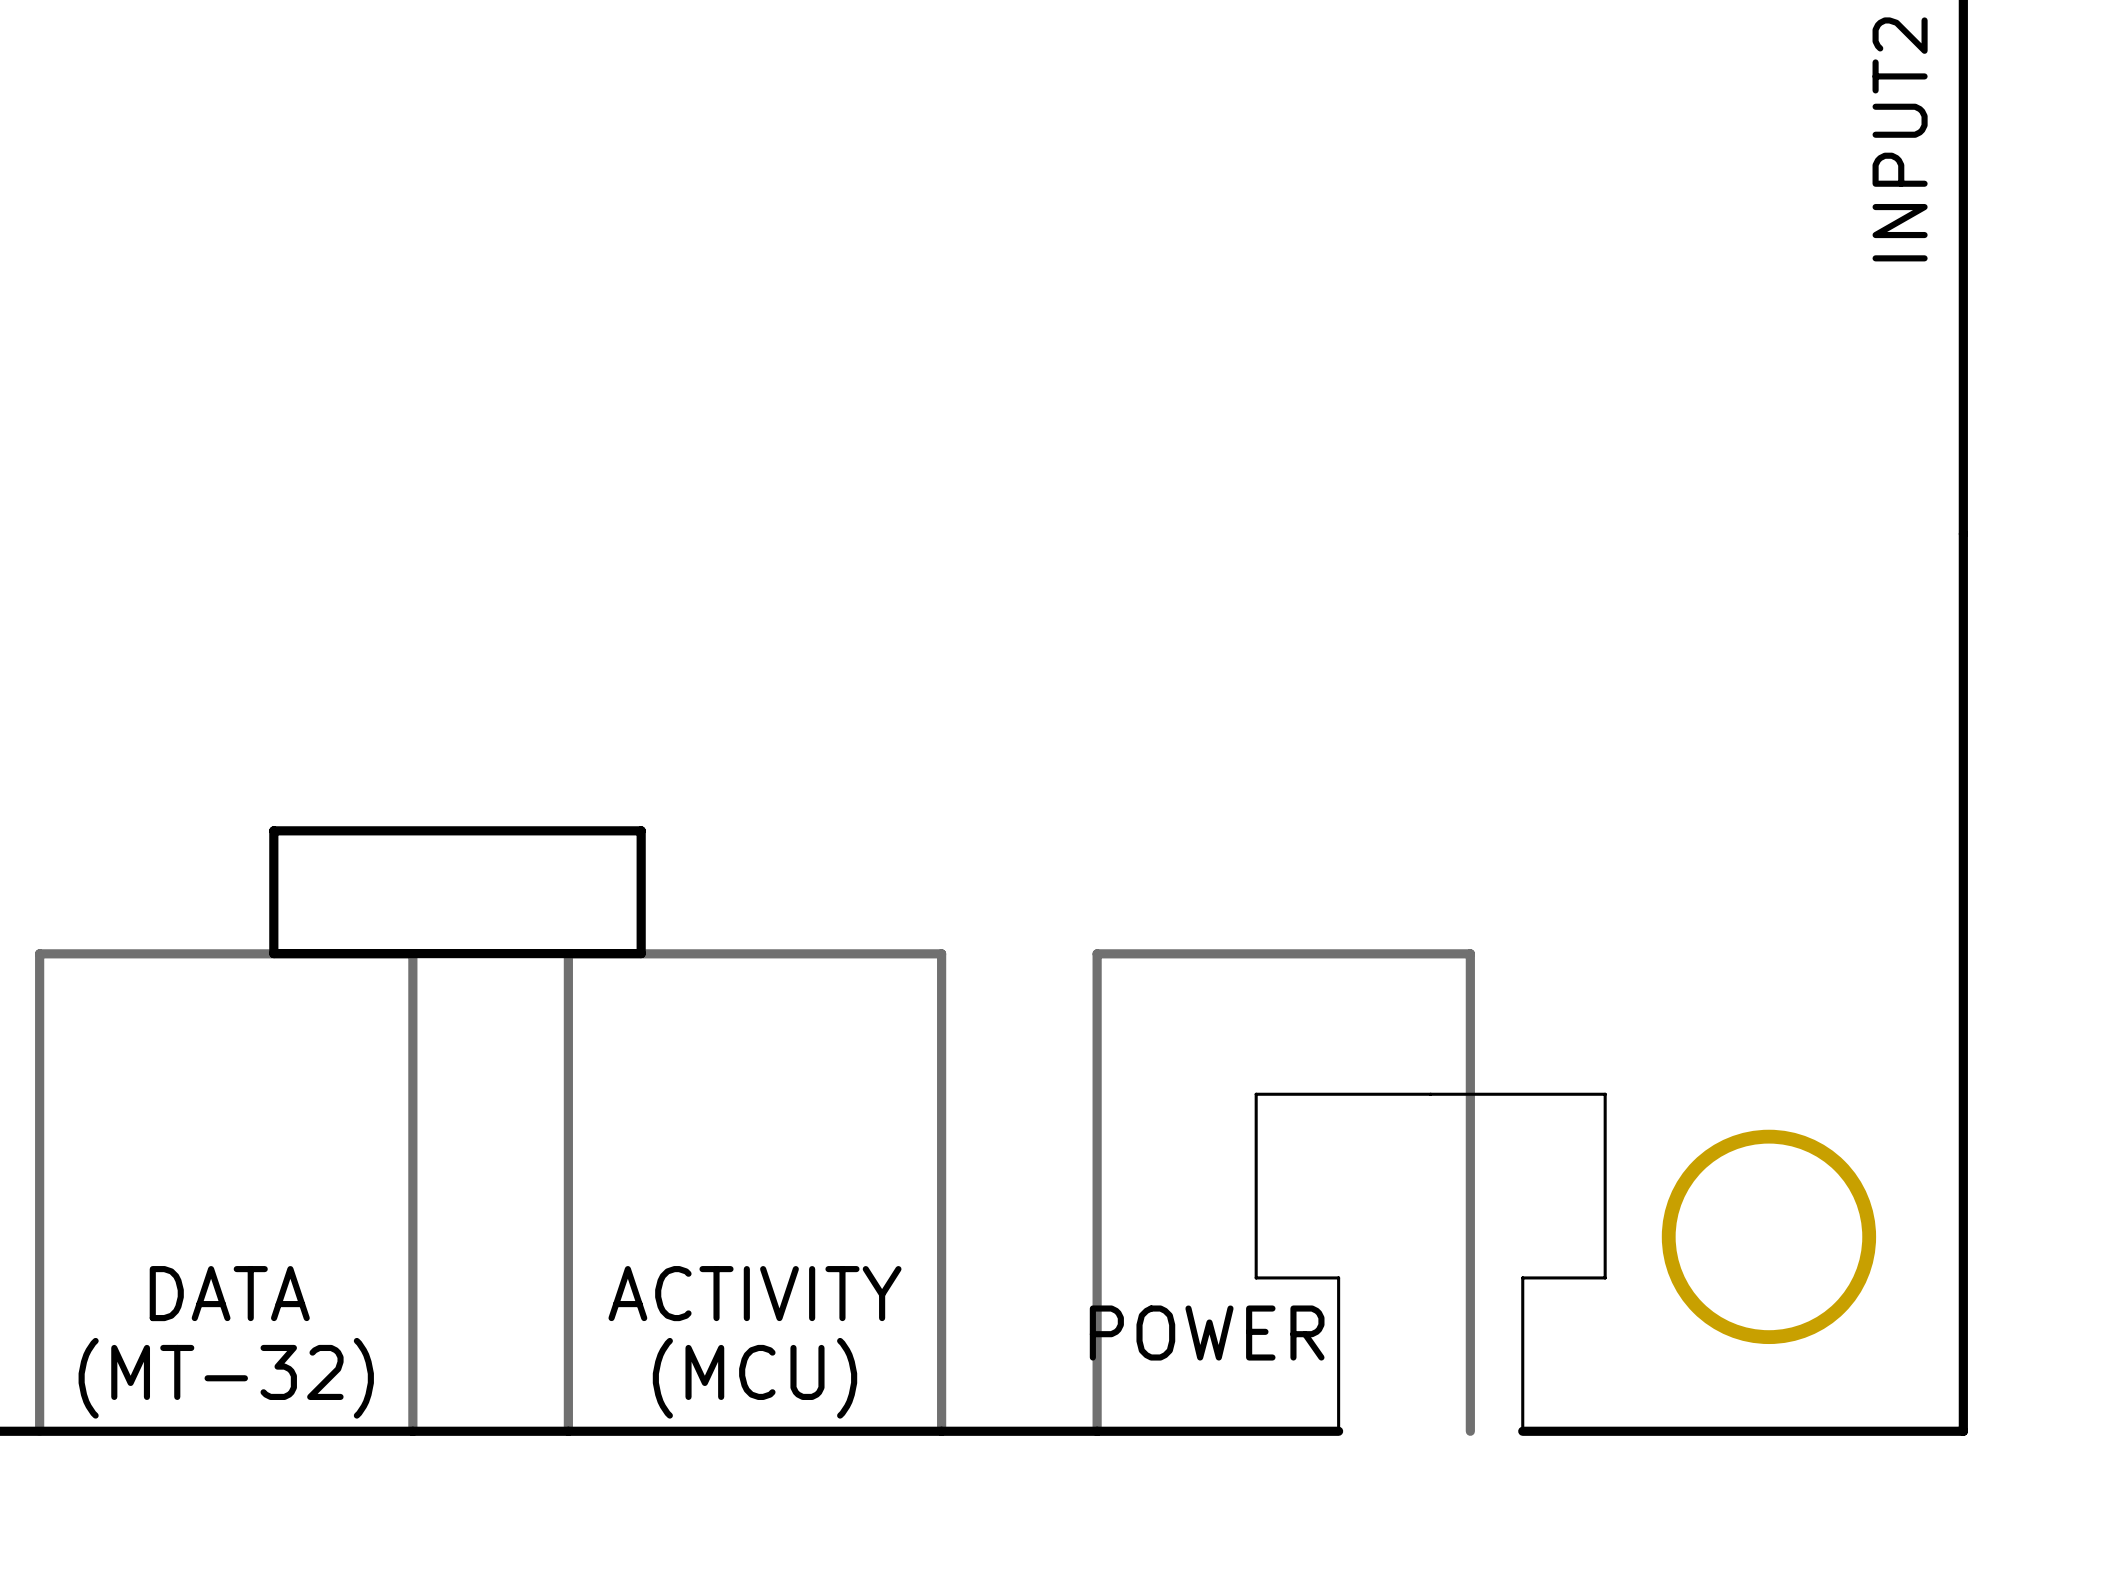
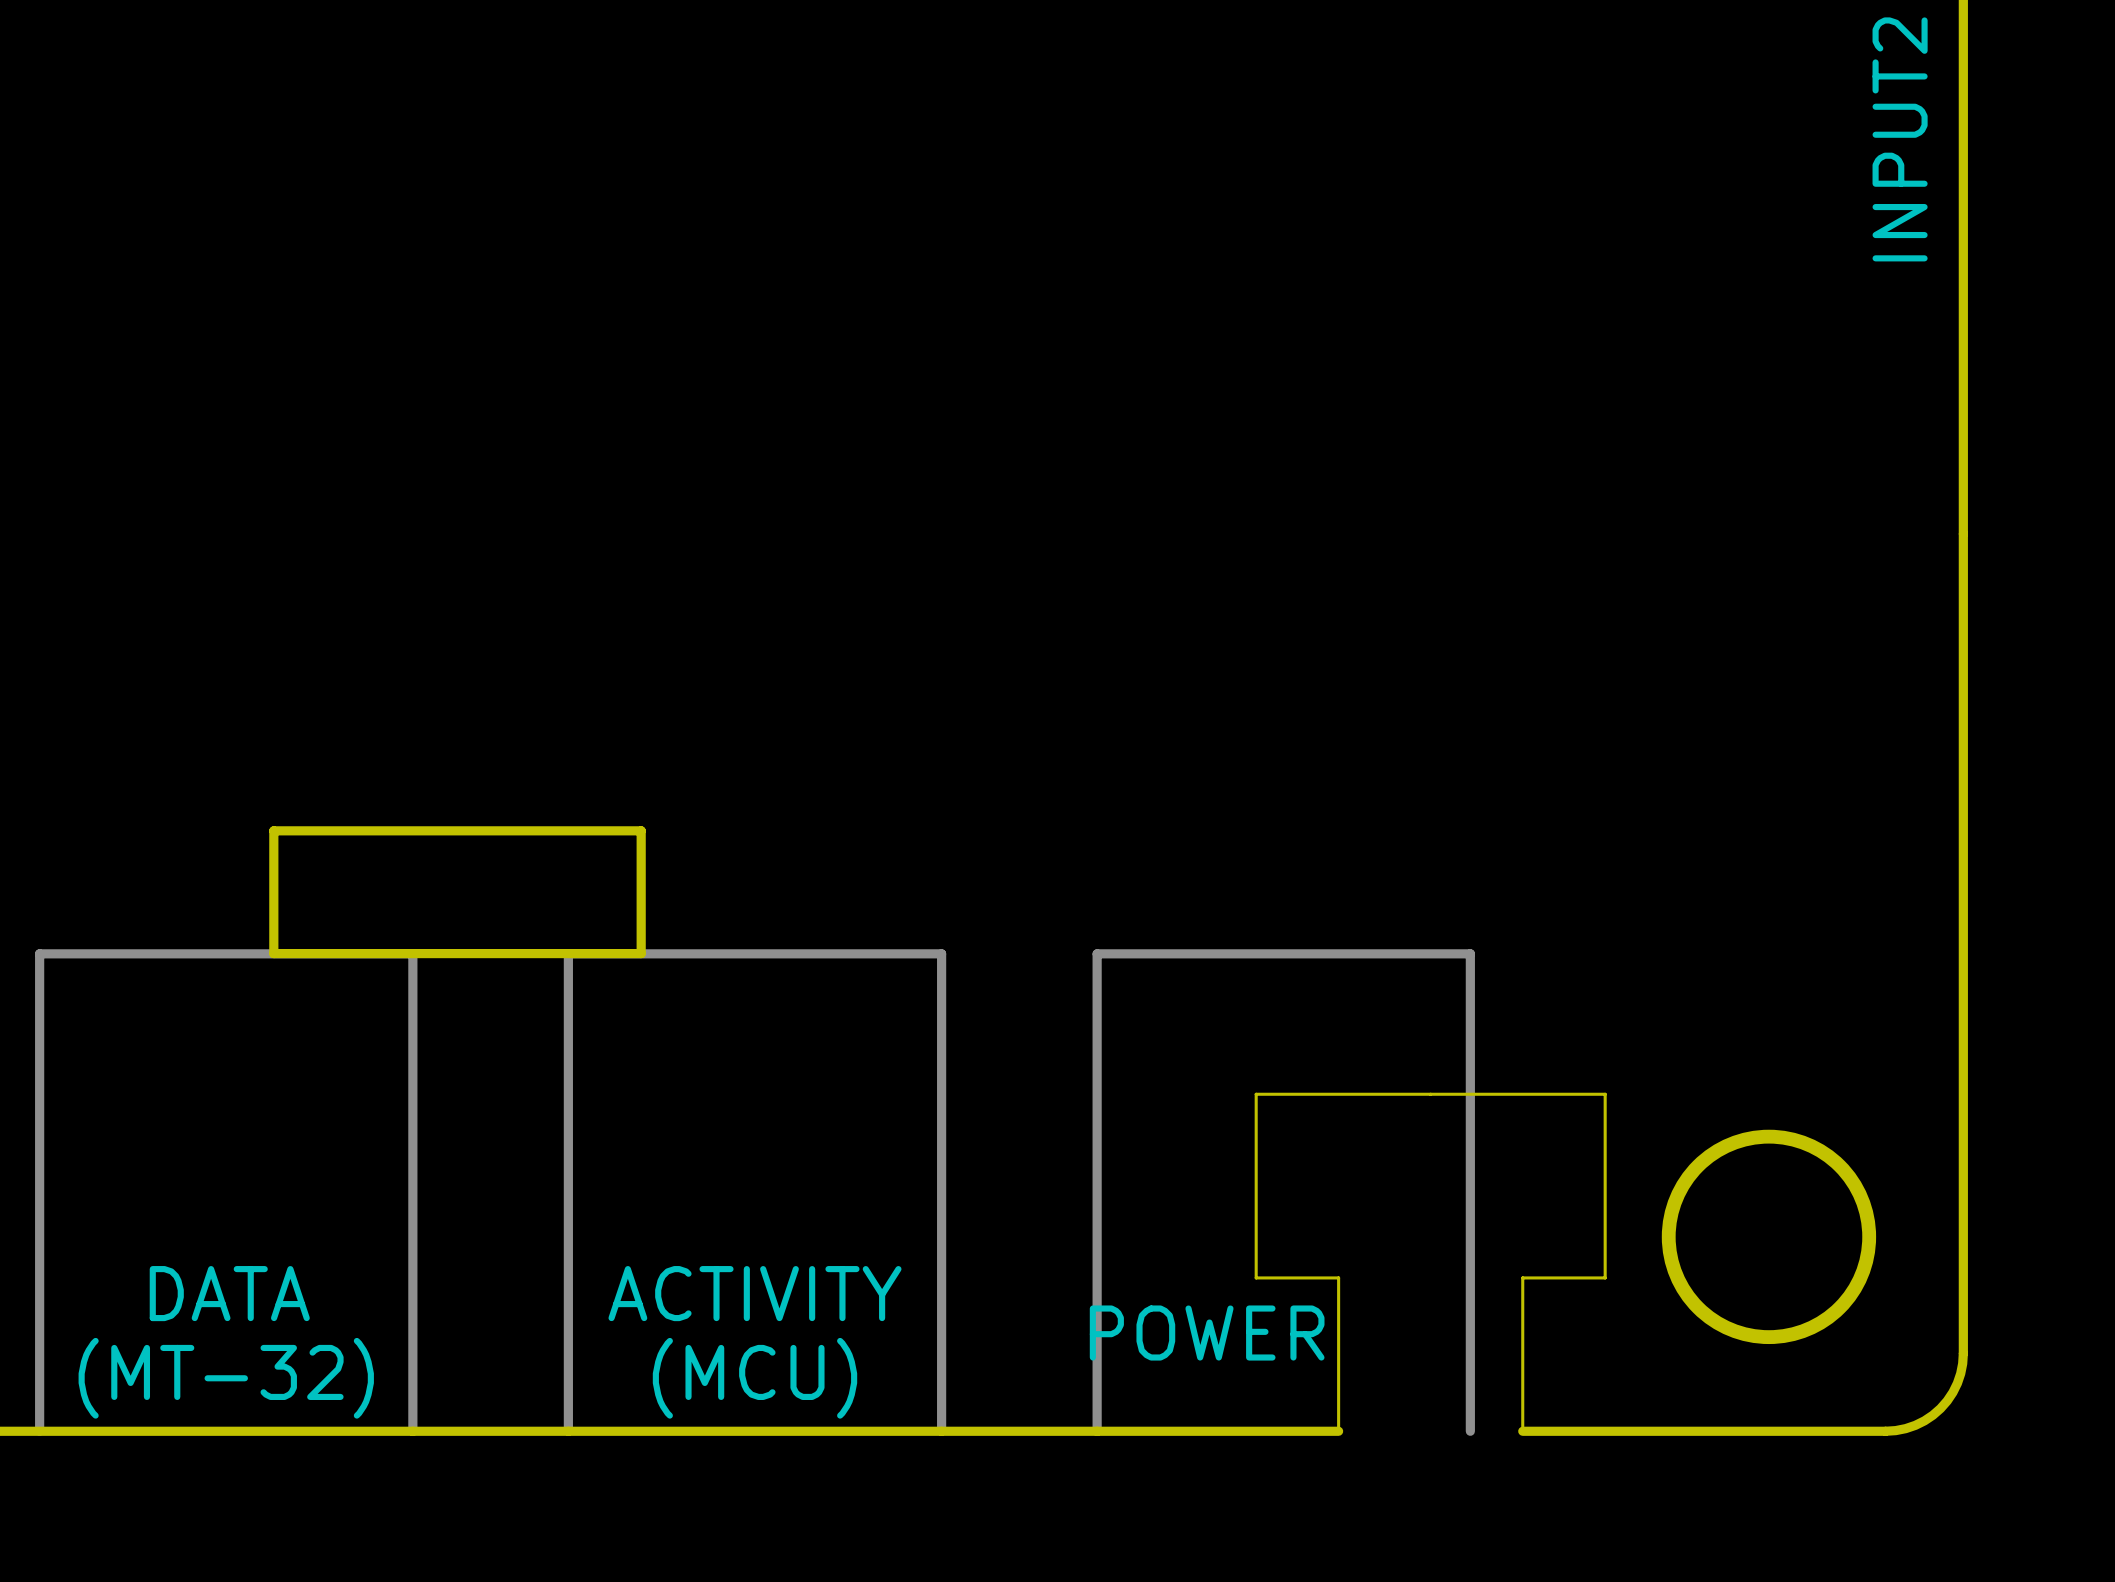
board edge: (1963, 1353) (1963, 1431) (1885, 1431) -> (1963, 1353) (1957, 1383) (1940, 1408) (1915, 1425) (1885, 1431)

